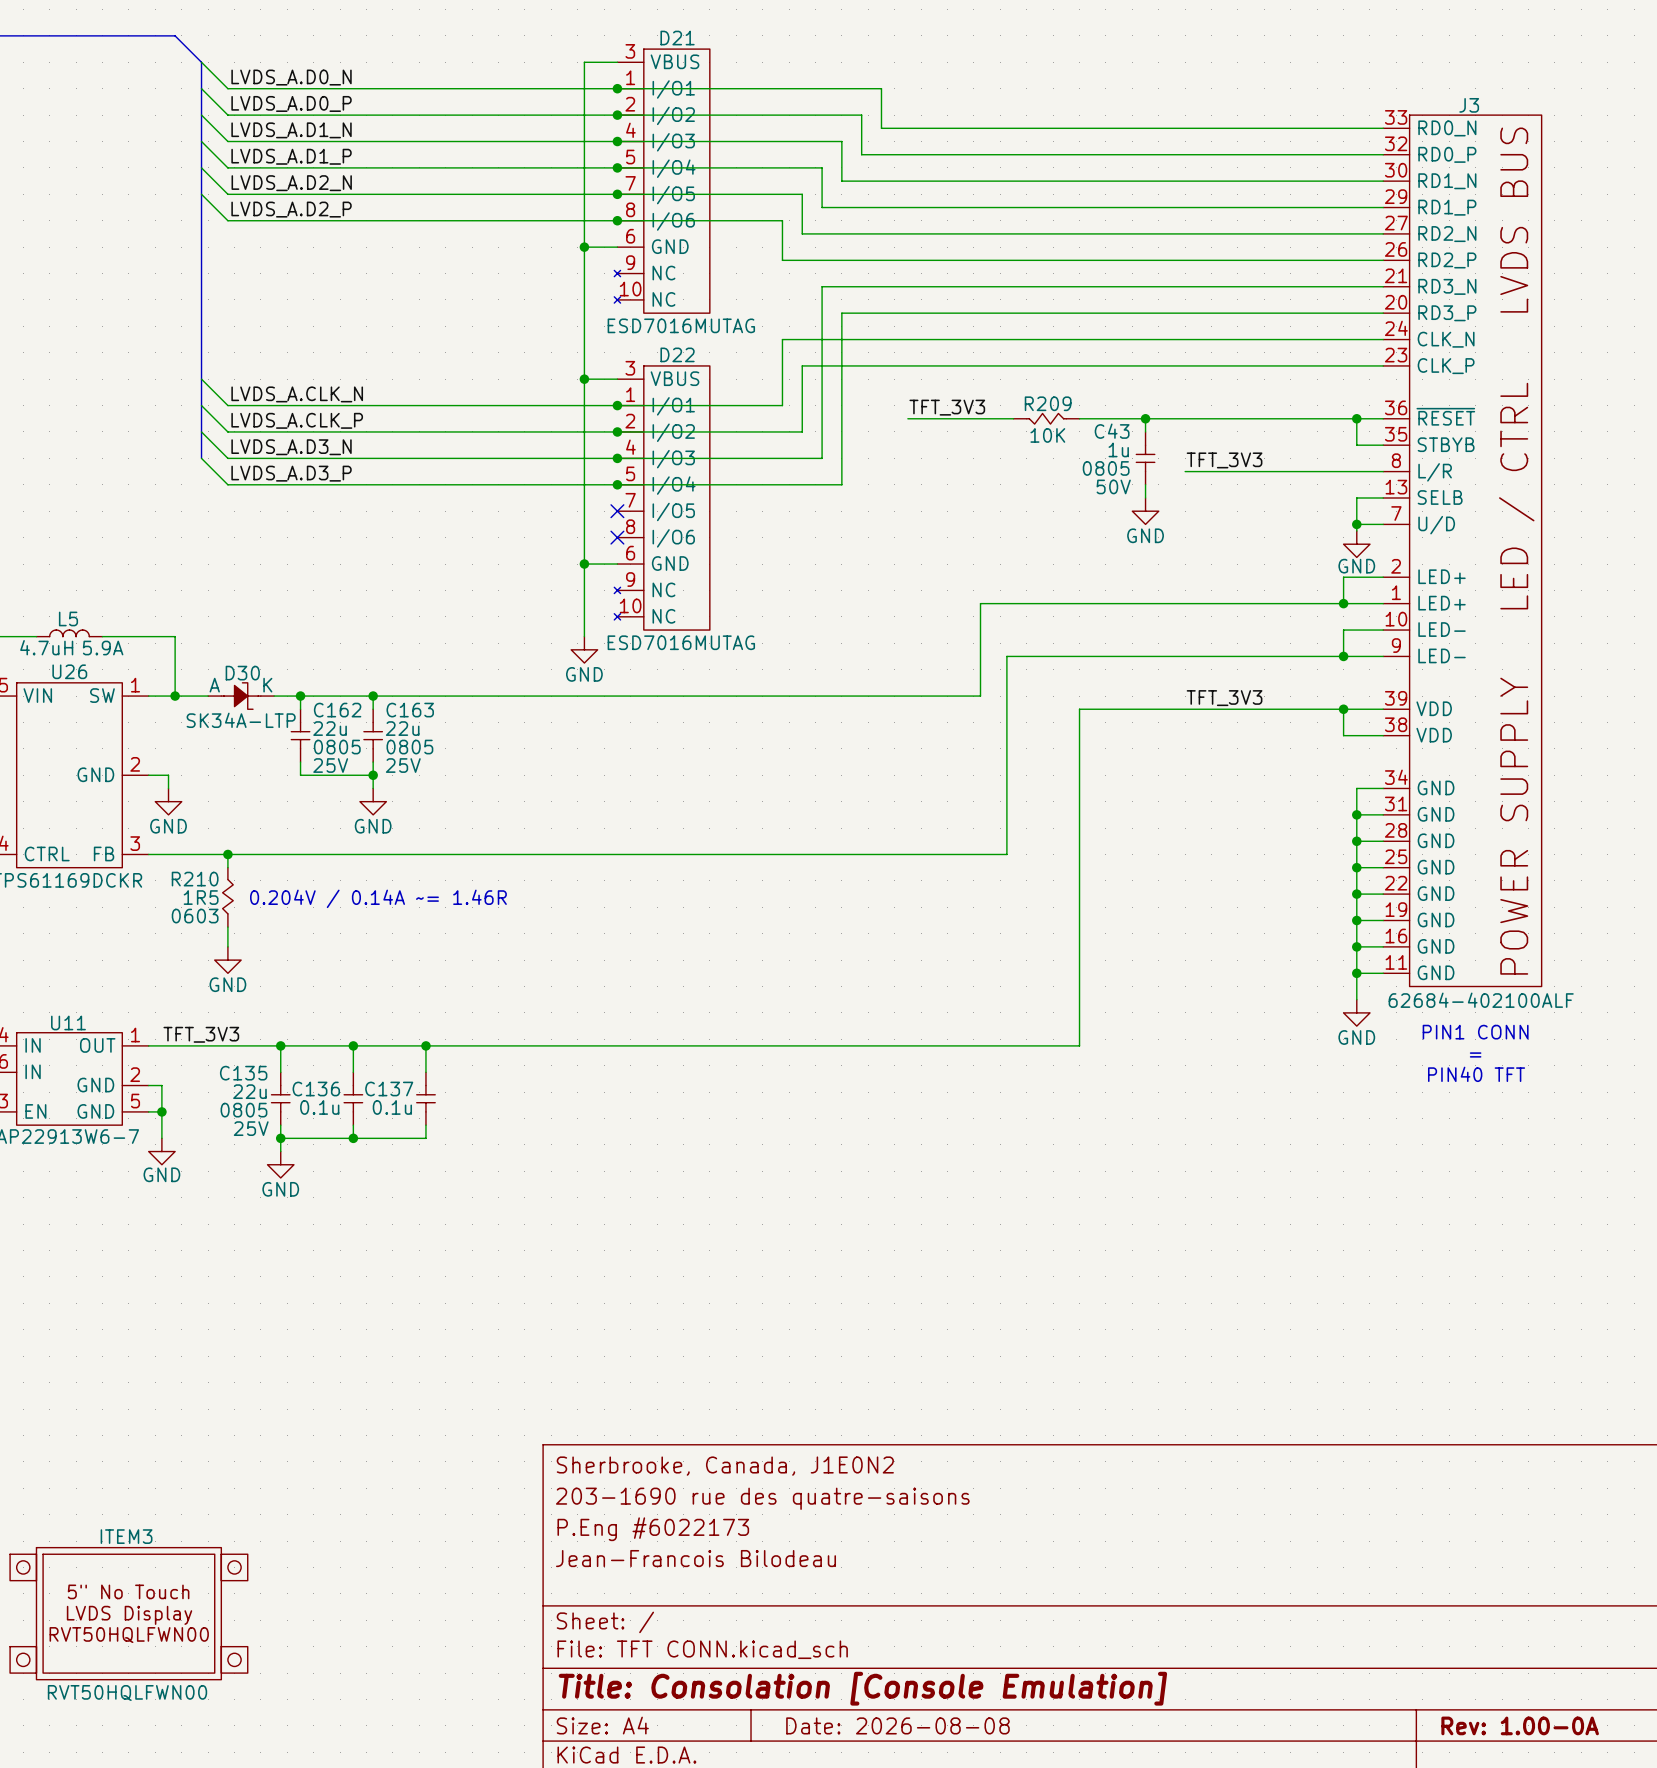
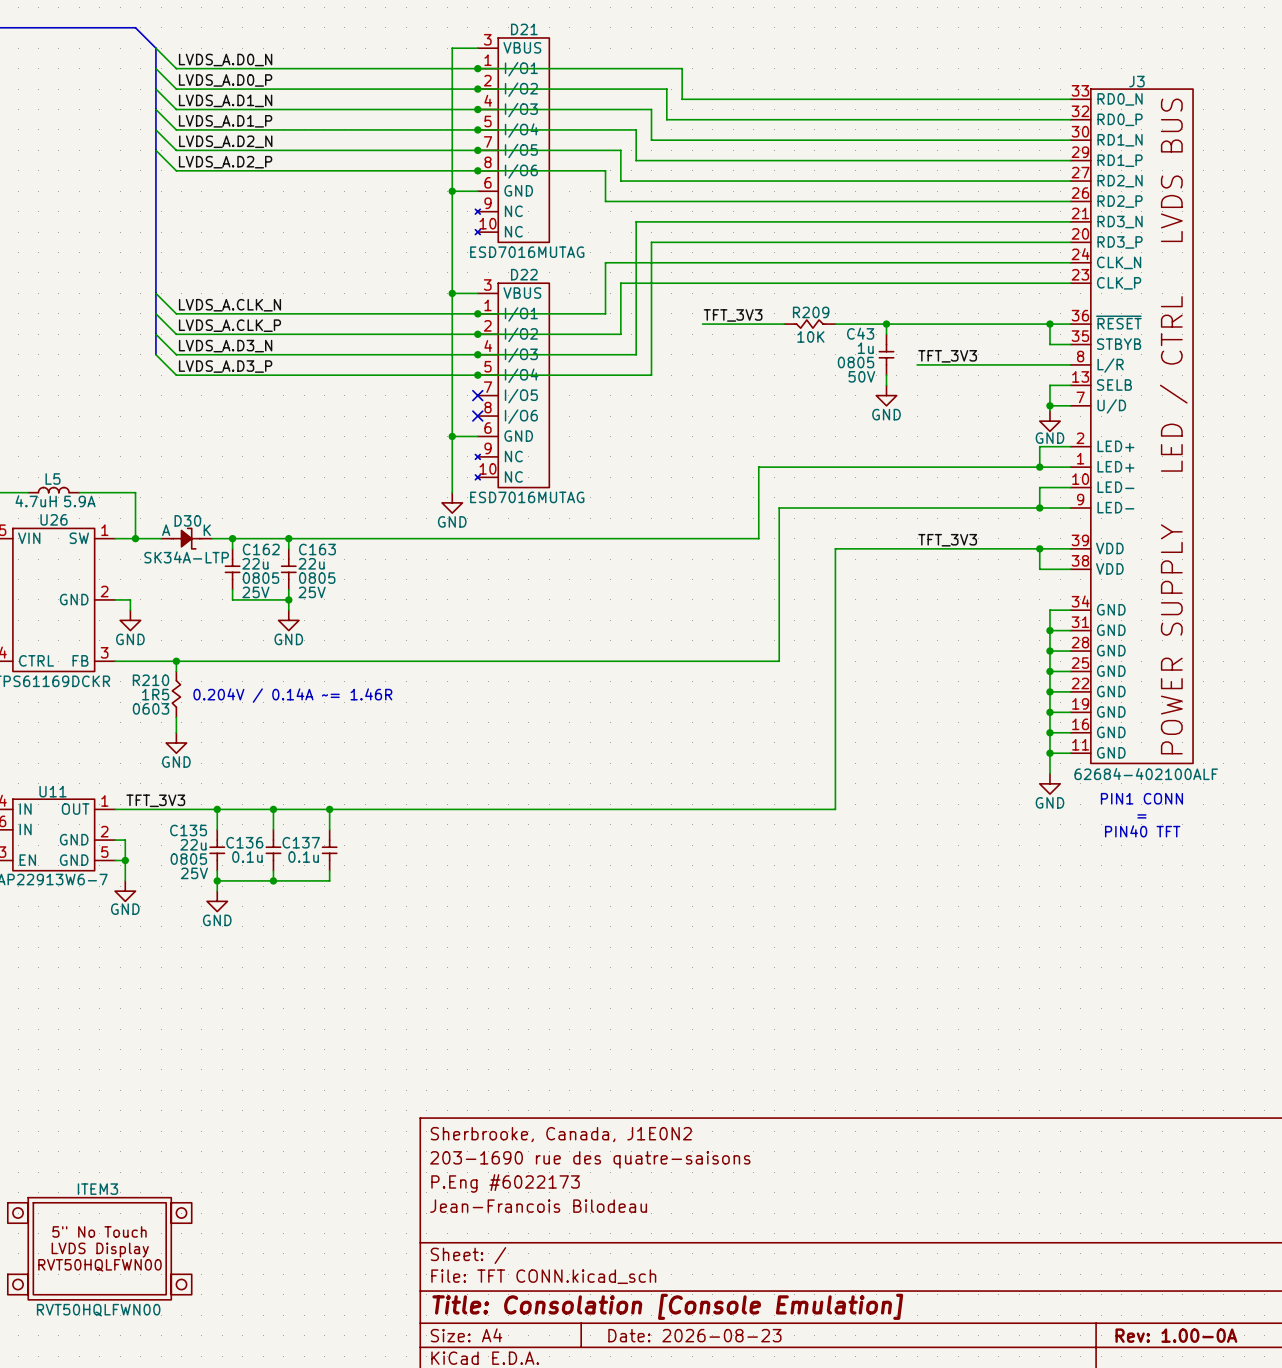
title block: Date: 2026-08-08 (897, 1725) -> Date: 2026-08-23 (694, 1335)

